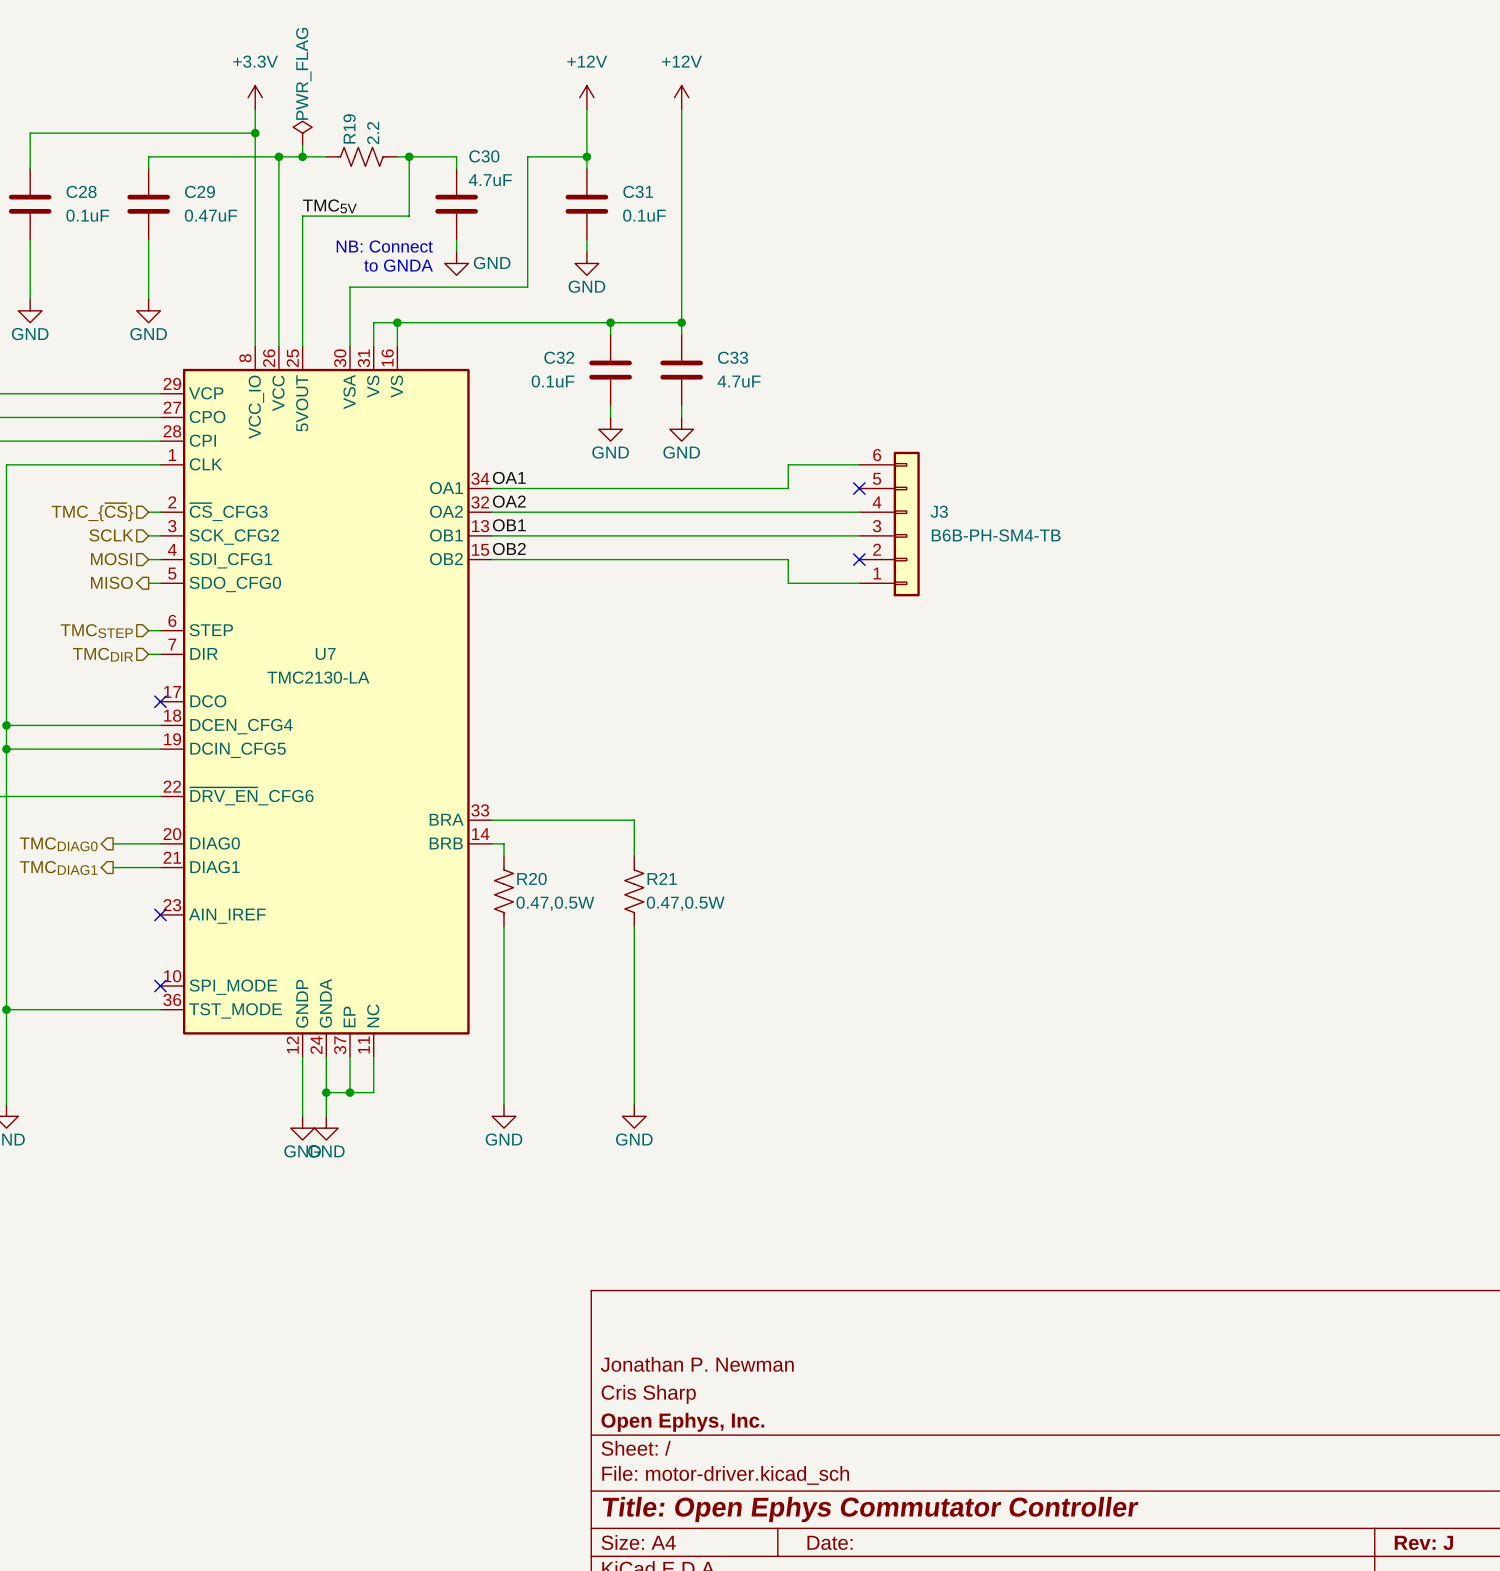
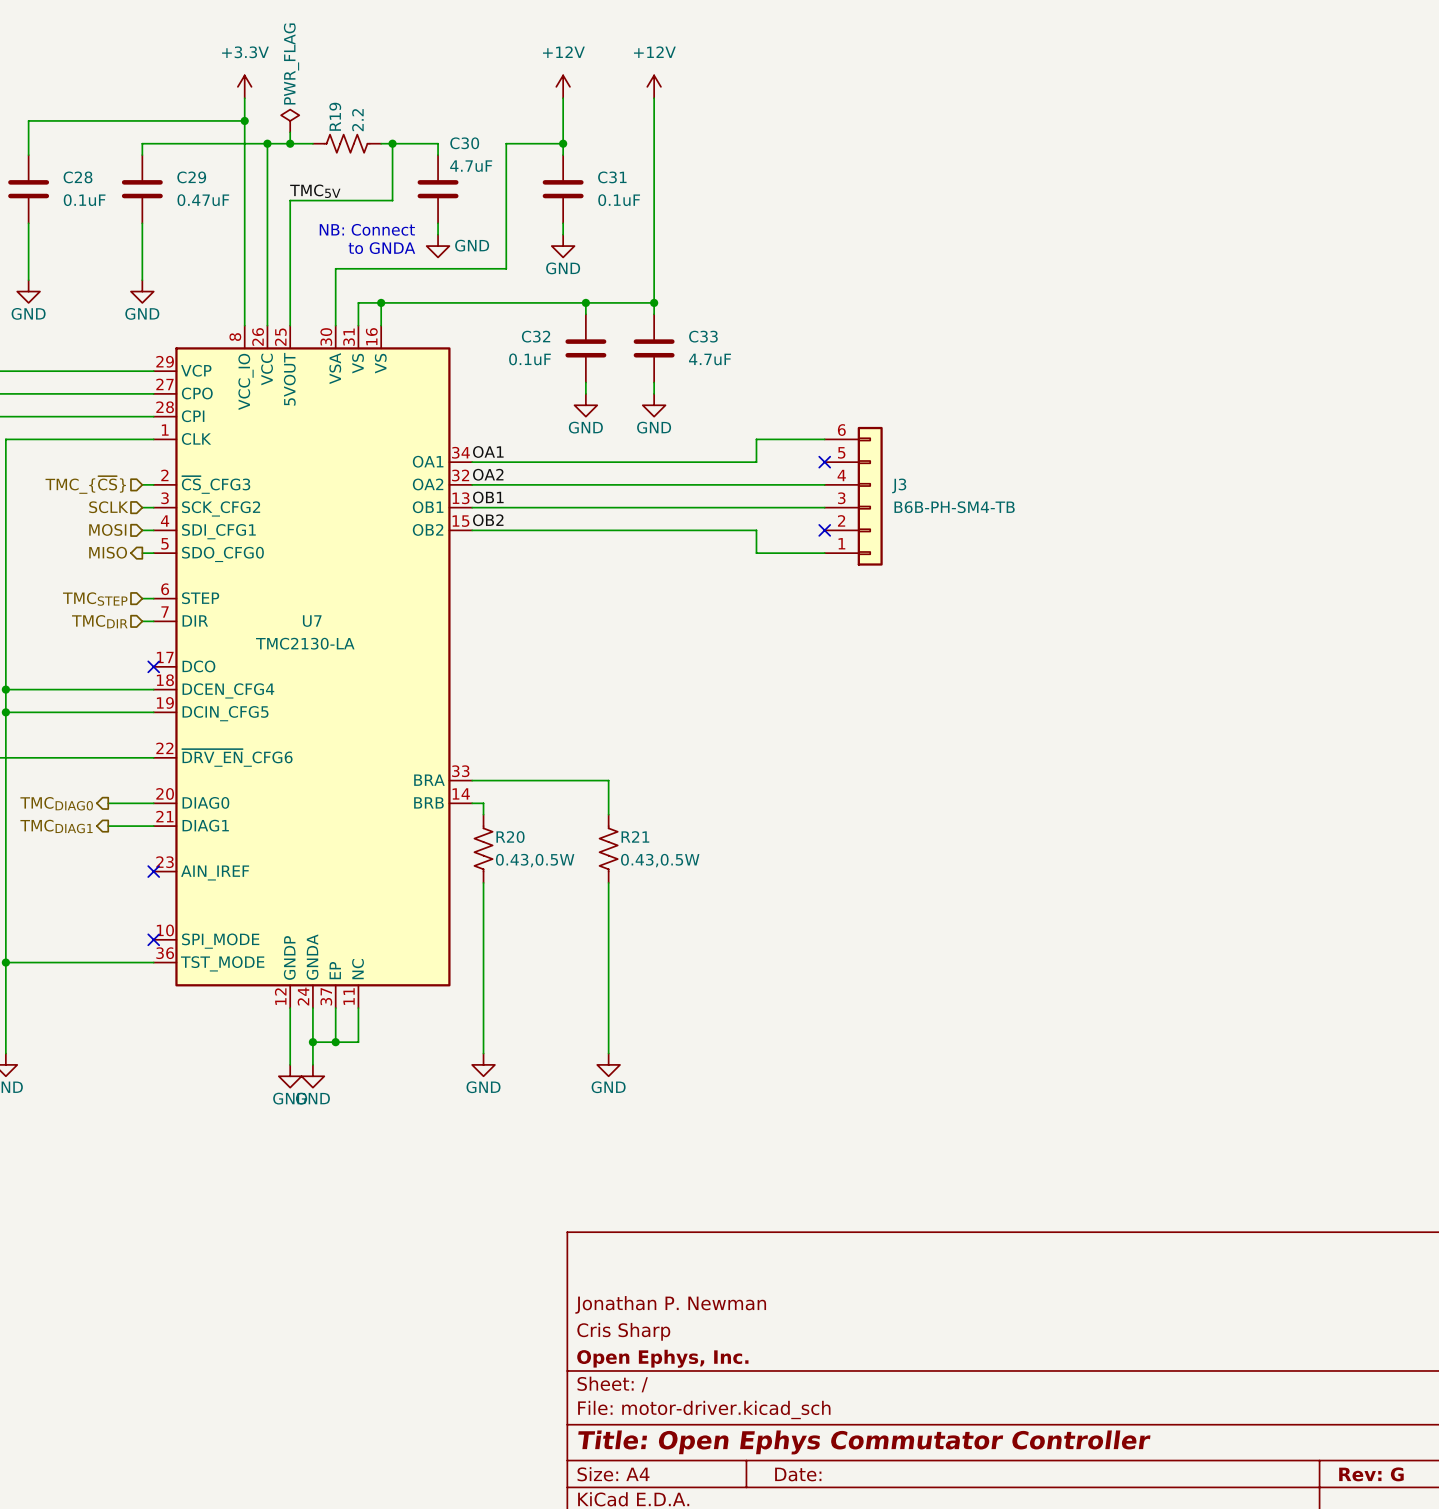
R20 value: 0.47,0.5W (555, 903) -> 0.43,0.5W (535, 860)
R21 value: 0.47,0.5W (685, 903) -> 0.43,0.5W (660, 860)
title block: Rev: J (1423, 1542) -> Rev: G (1371, 1474)

